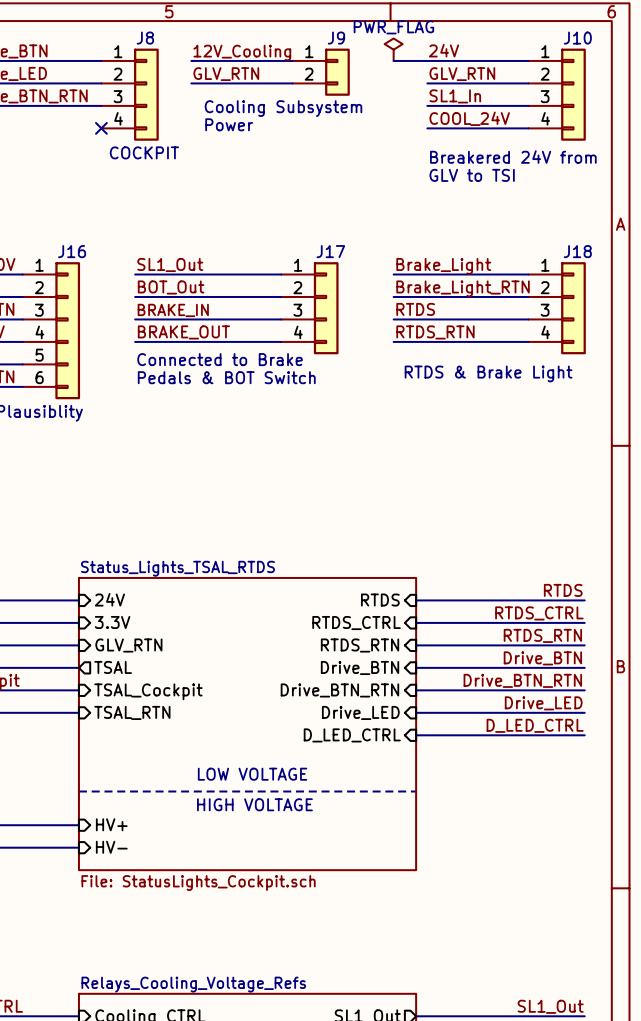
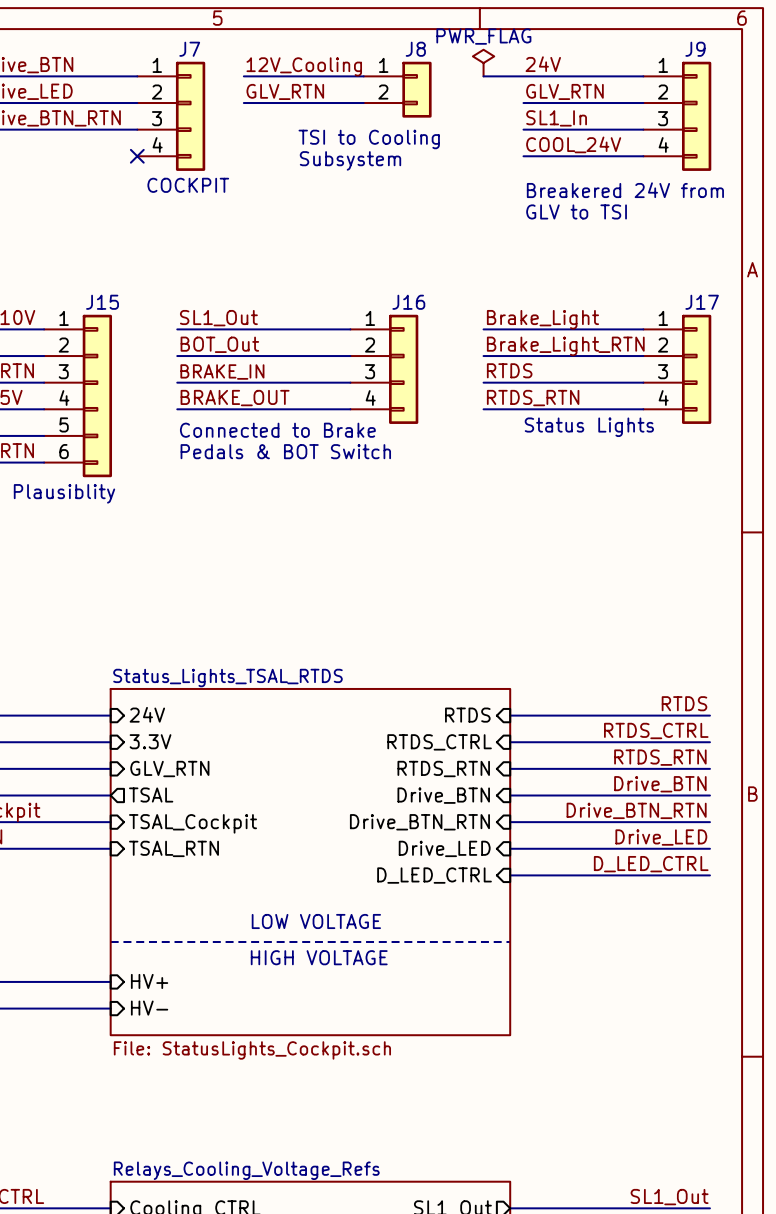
J8 name: J8 (145, 38) -> J7 (189, 49)
J9 name: J9 (336, 38) -> J8 (415, 49)
J10 name: J10 (577, 38) -> J9 (695, 49)
text: Cooling Subsystem (283, 108) -> none
text: none -> TSI to Cooling (369, 139)
text: Power (229, 124) -> none
text: none -> Subsystem (350, 160)
J16 name: J16 (72, 251) -> J15 (102, 302)
J17 name: J17 (330, 251) -> J16 (408, 302)
J18 name: J18 (577, 251) -> J17 (702, 302)
text: none -> Status Lights (589, 427)
text: RTDS & Brake Light (488, 373) -> none

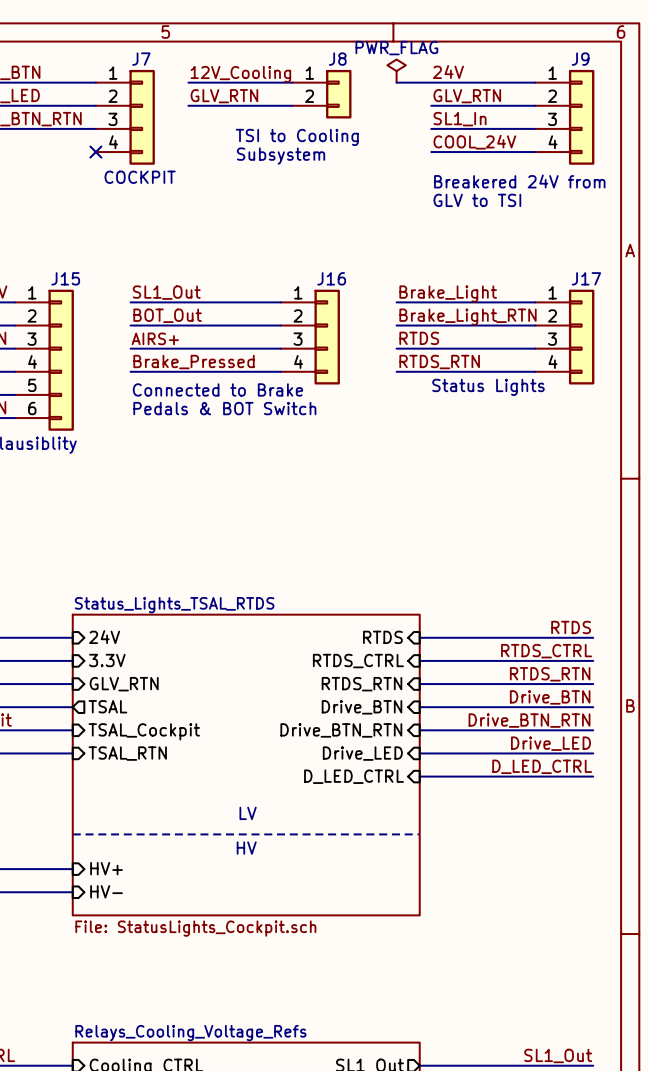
label: BRAKE_IN (222, 372) -> AIRS+ (155, 338)
label: BRAKE_OUT (235, 398) -> Brake_Pressed (194, 362)
text: none -> LV (248, 813)
text: LOW VOLTAGE (316, 921) -> none
text: none -> HV (246, 848)
text: HIGH VOLTAGE (319, 957) -> none

